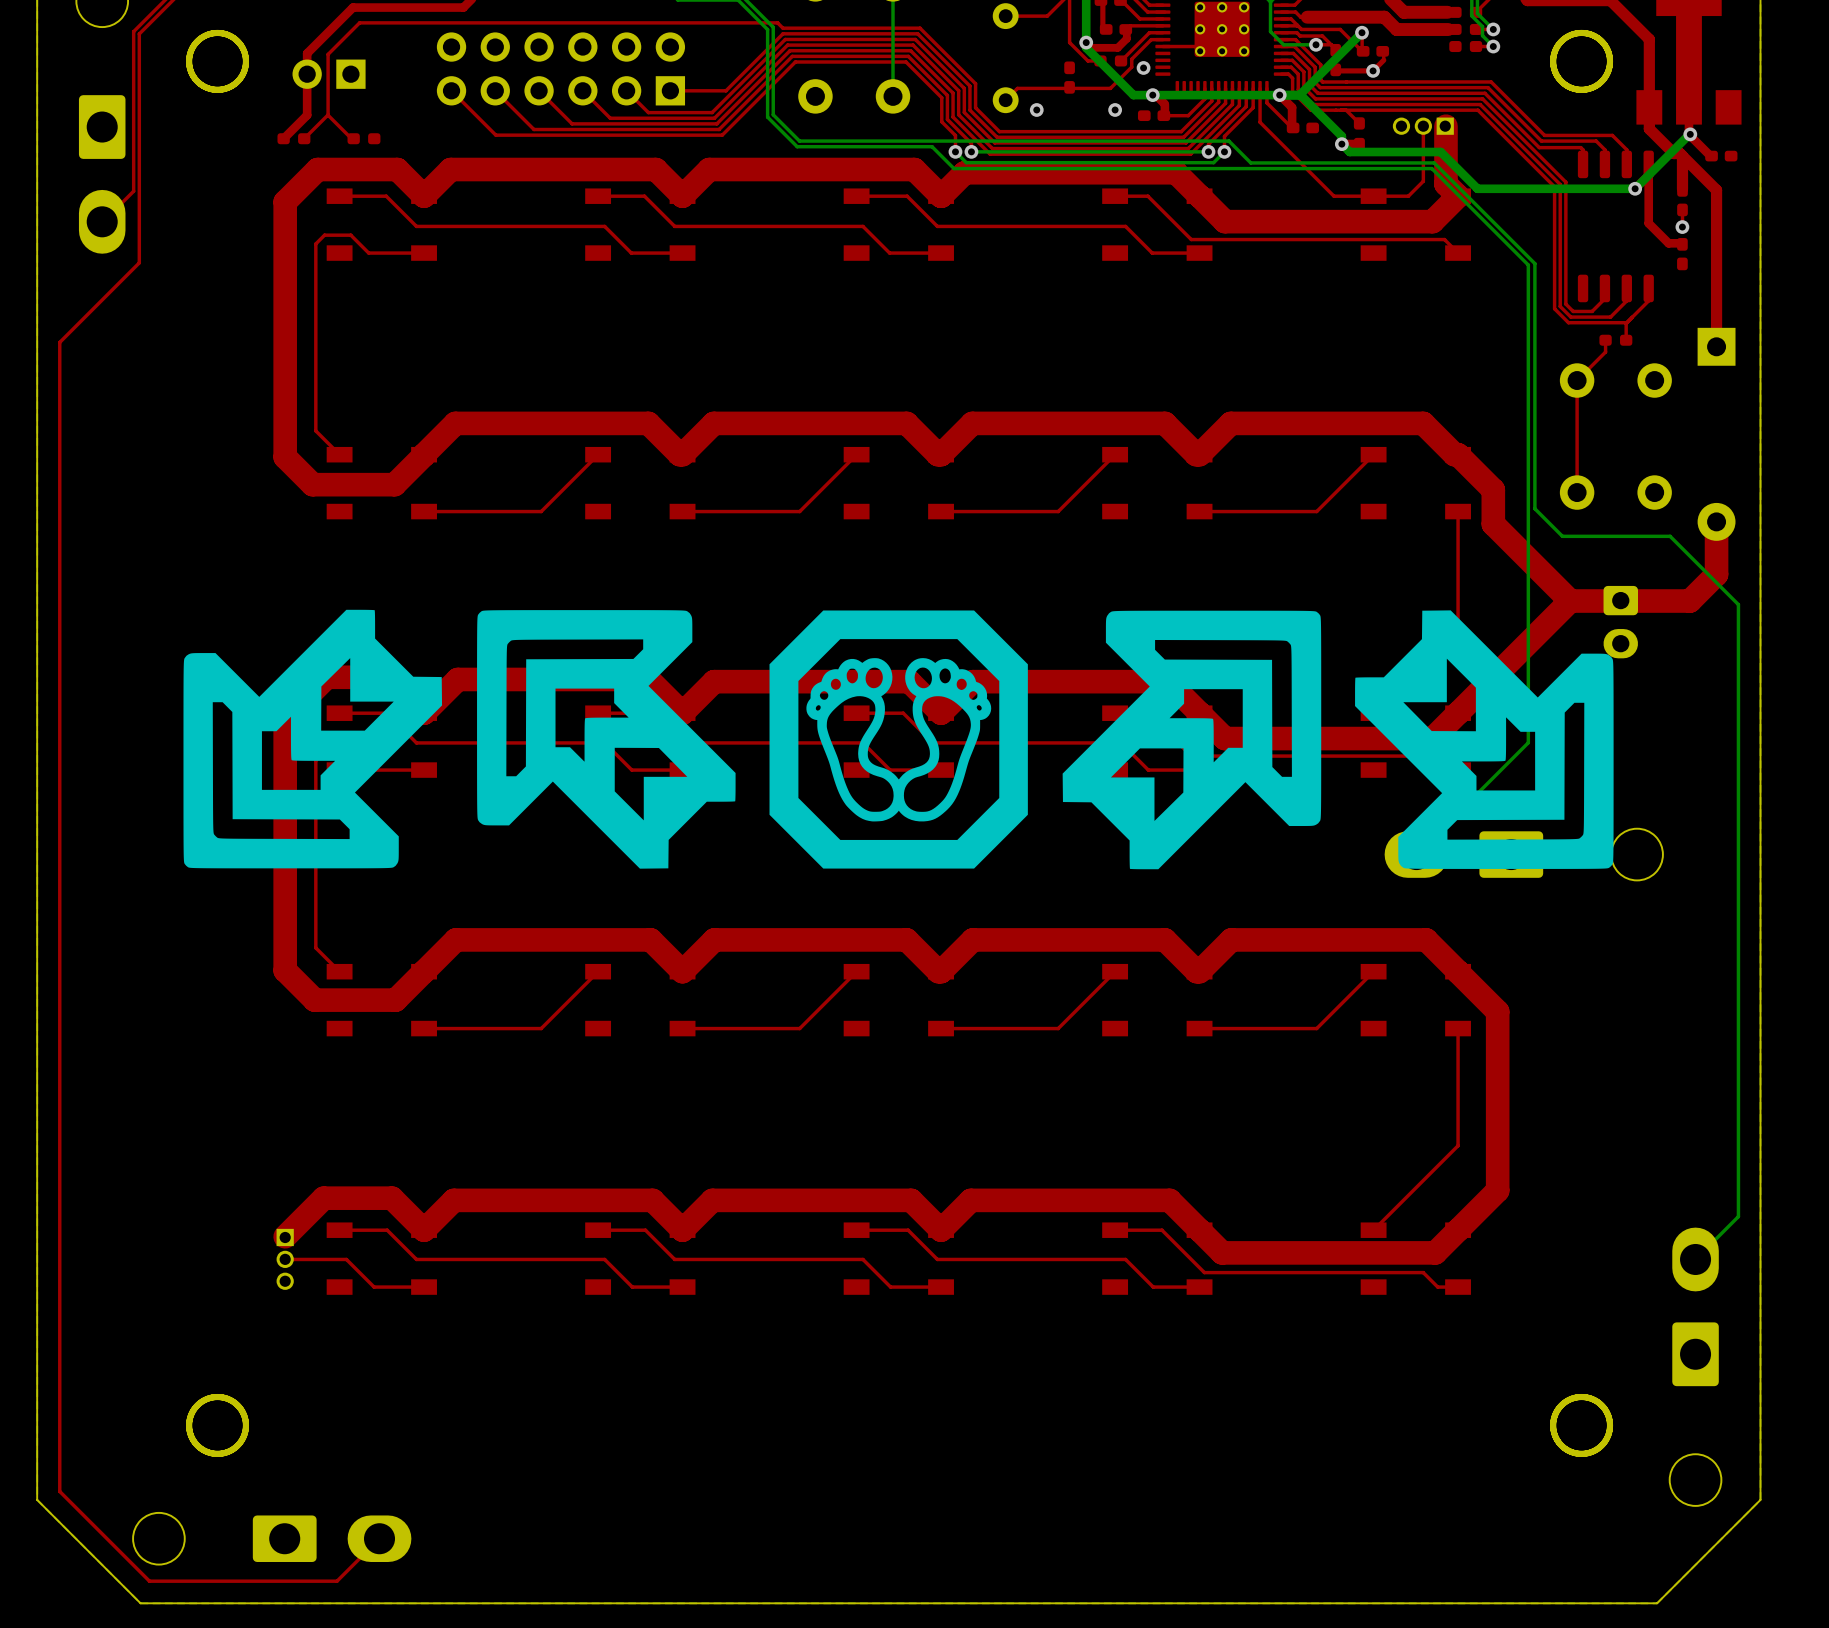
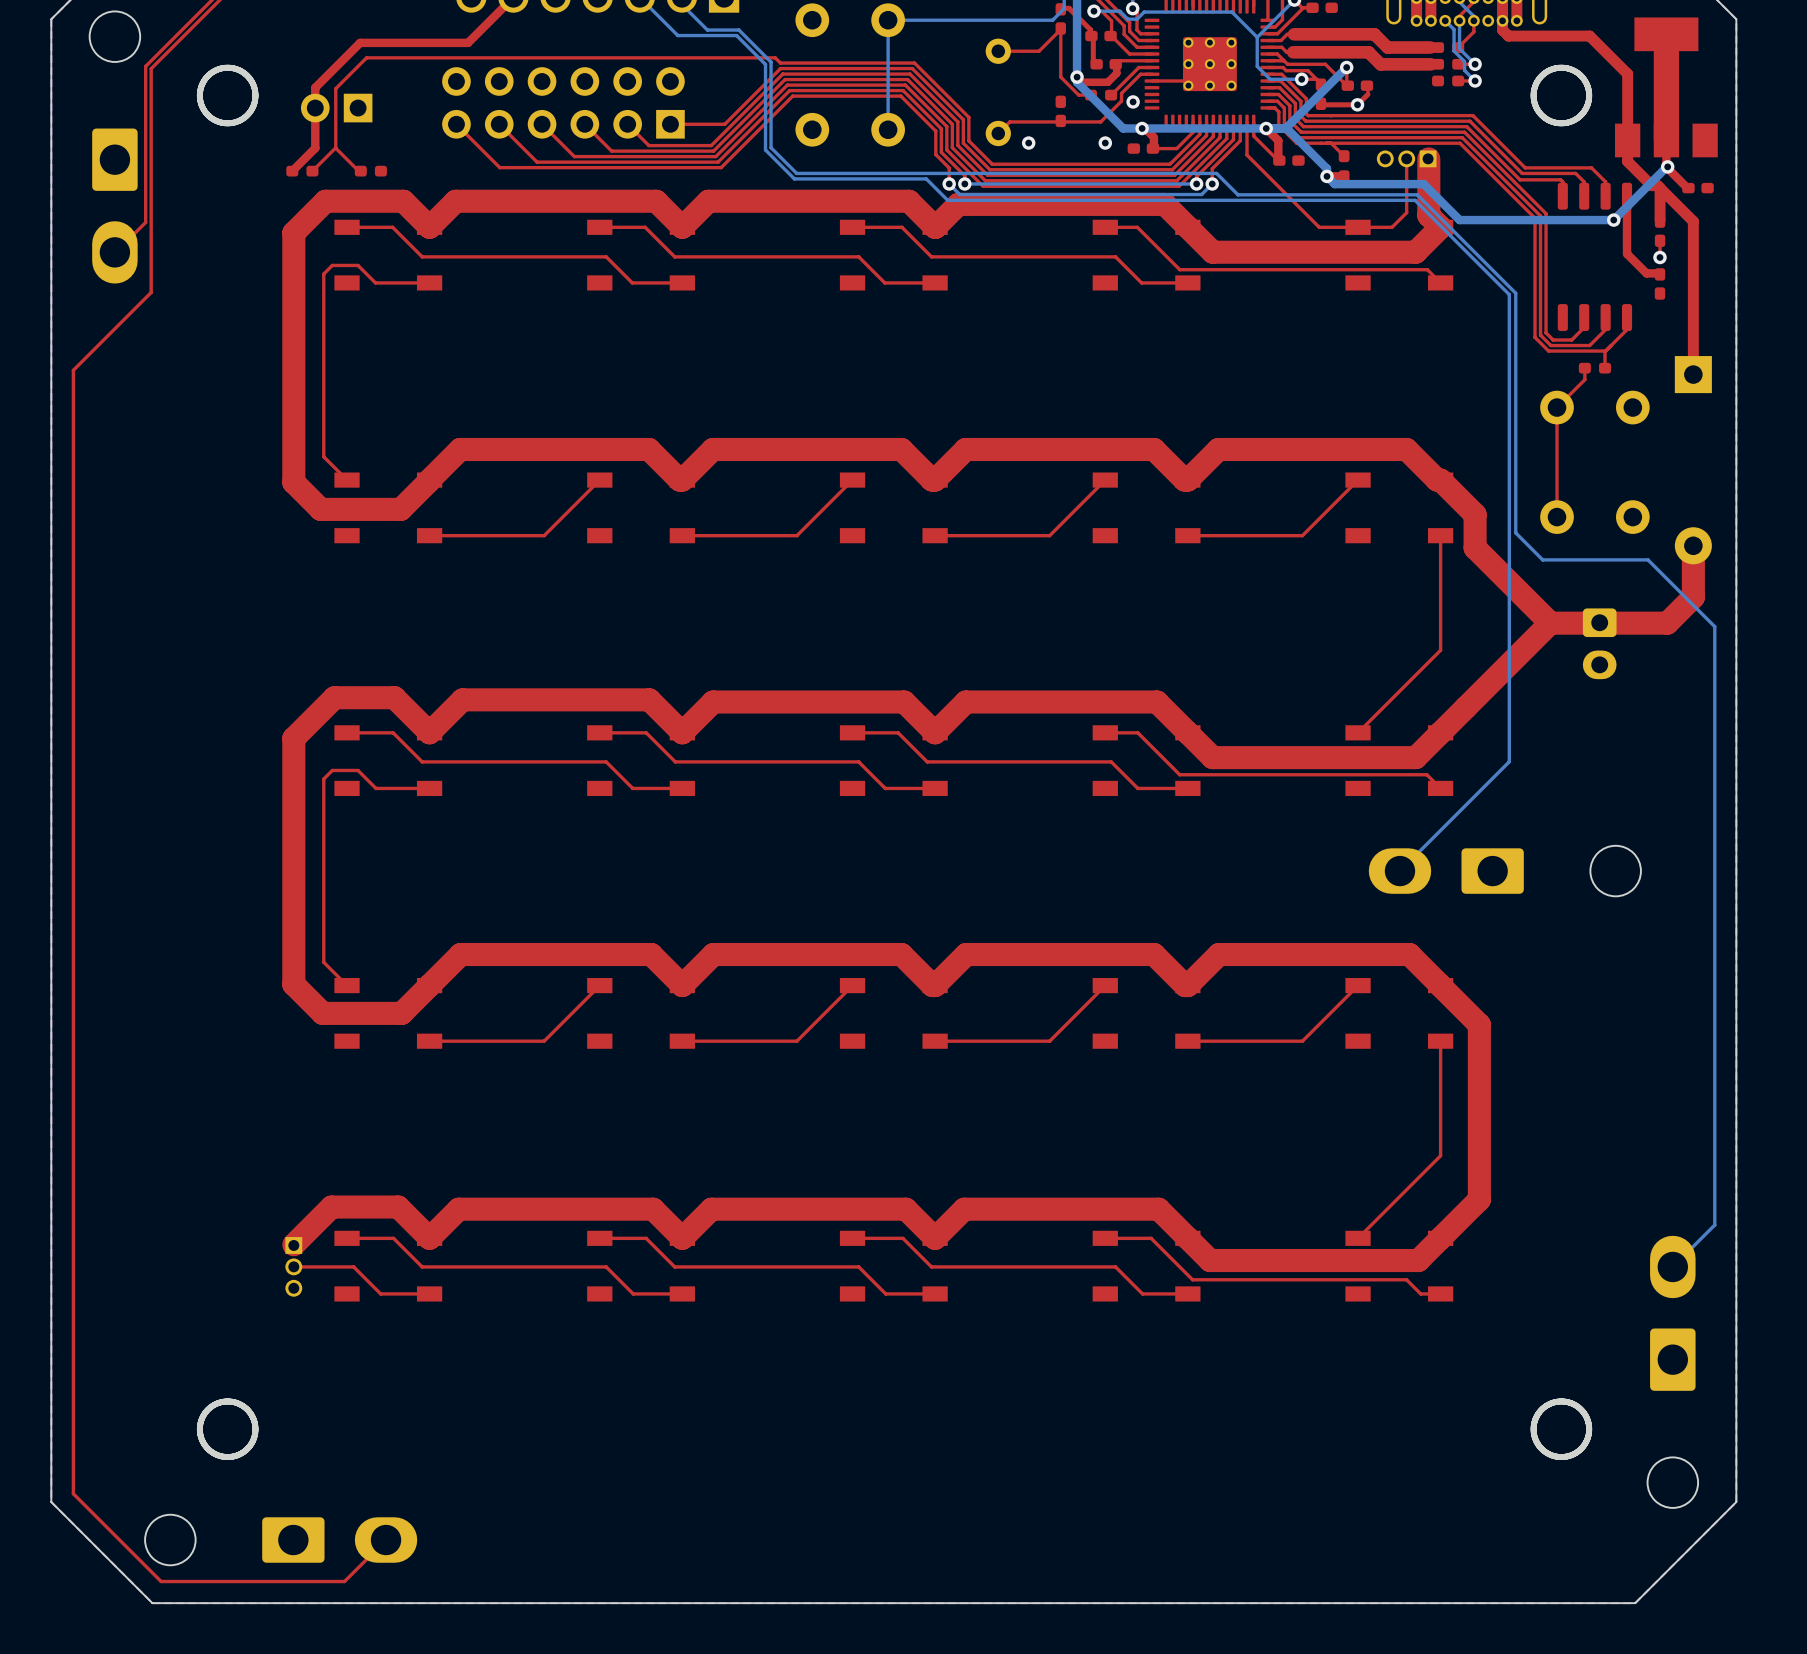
drawing: [183, 609, 443, 869] -> none
drawing: [477, 610, 736, 869] -> none
drawing: [769, 610, 1028, 869] -> none
drawing: [1062, 610, 1322, 870] -> none
drawing: [1355, 610, 1614, 869] -> none

